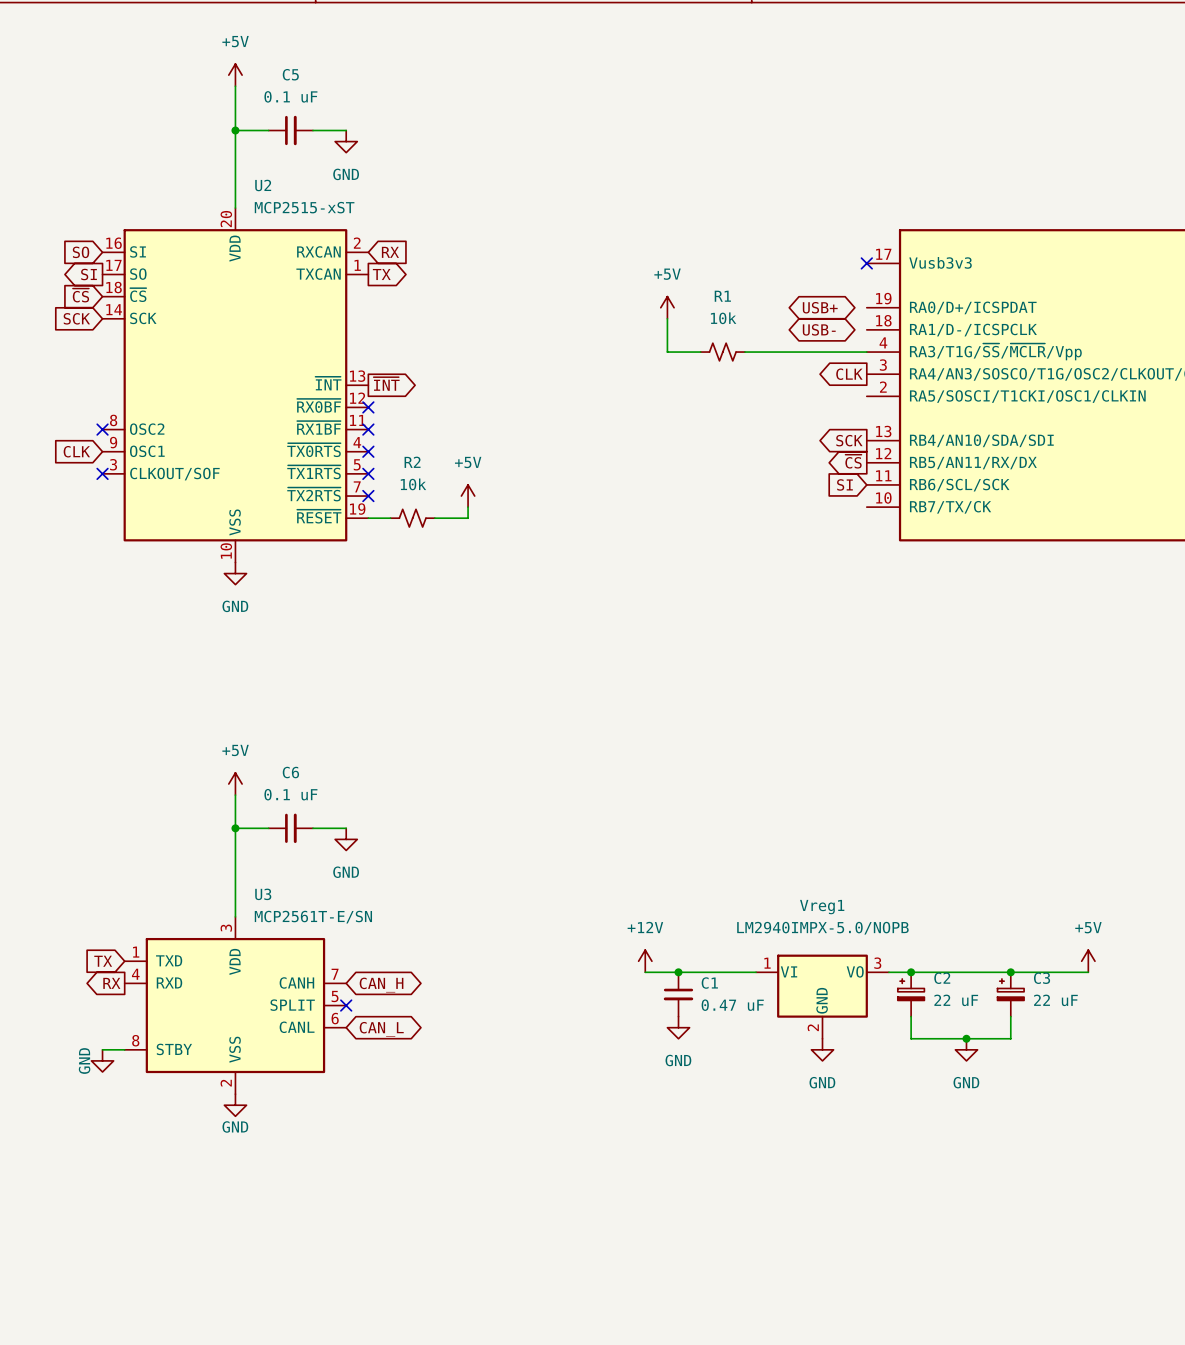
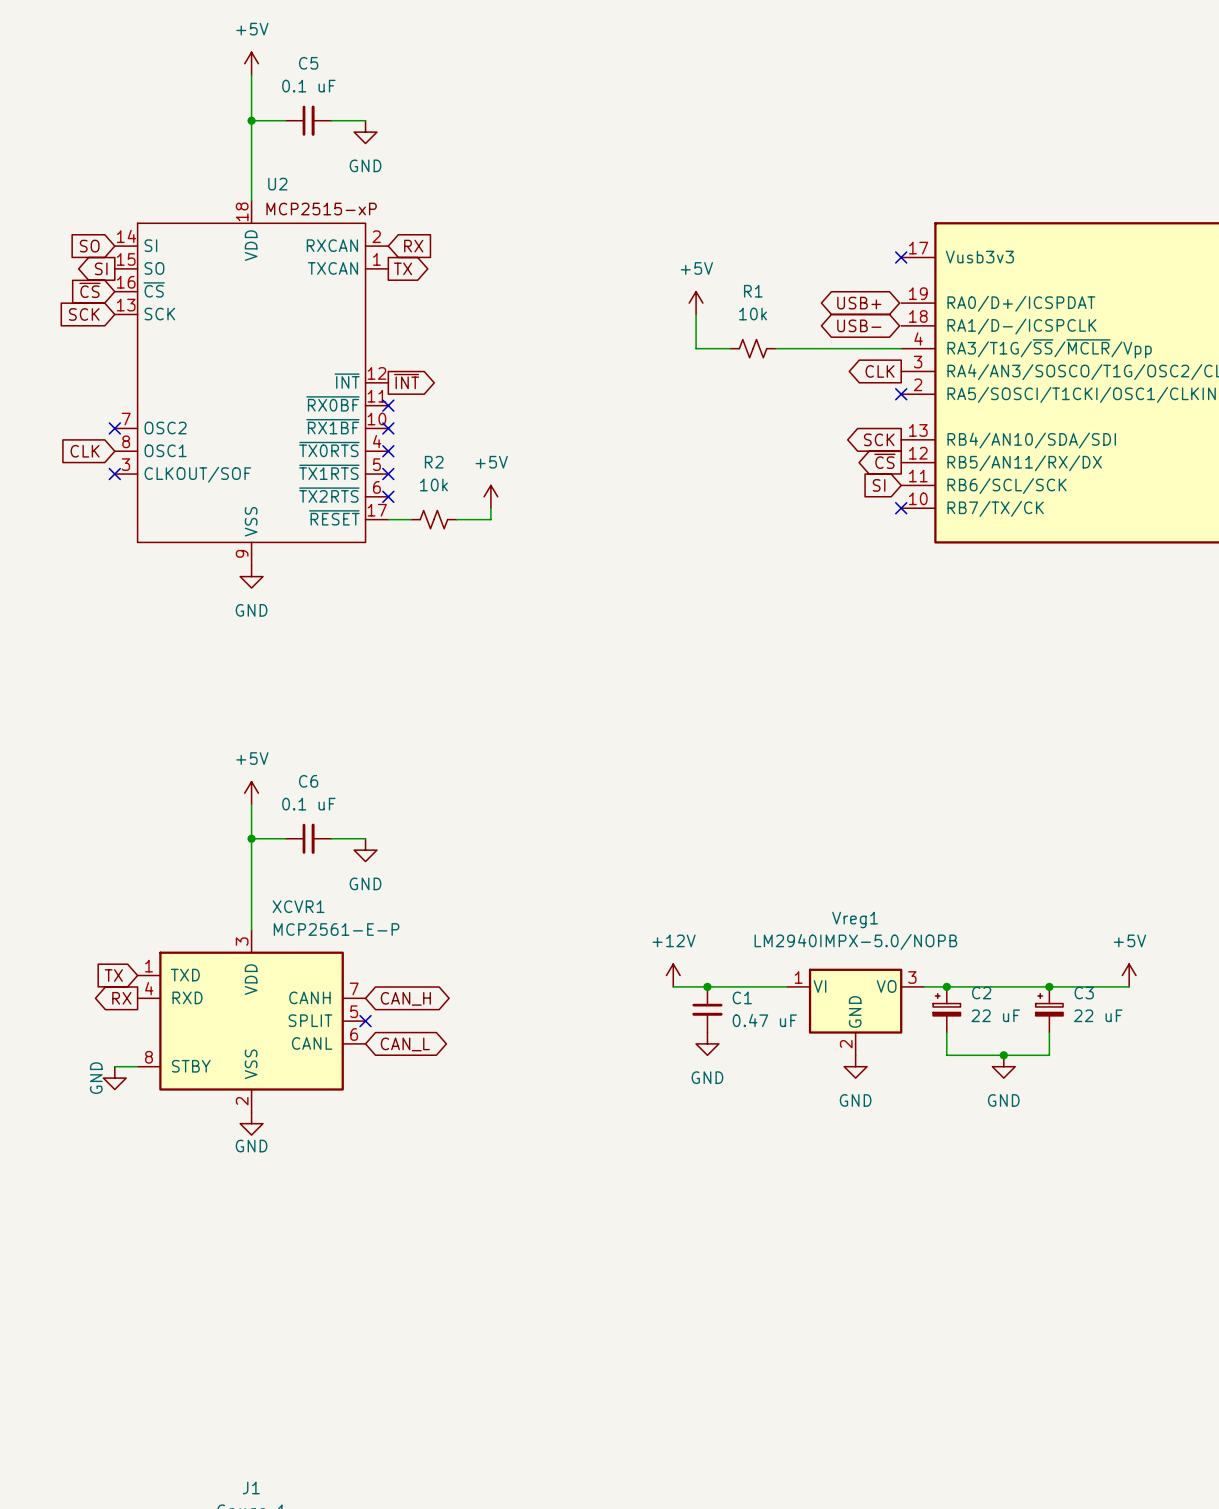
U2 value: MCP2515-xST (304, 207) -> none
U2 symbol: [102, 208, 369, 563] -> [114, 200, 389, 566]
no-connect mark: none -> (901, 394)
no-connect mark: none -> (901, 508)
U3 name: U3 (263, 894) -> XCVR1 (298, 906)
U3 value: MCP2561T-E/SN (313, 917) -> MCP2561-E-P (336, 929)

